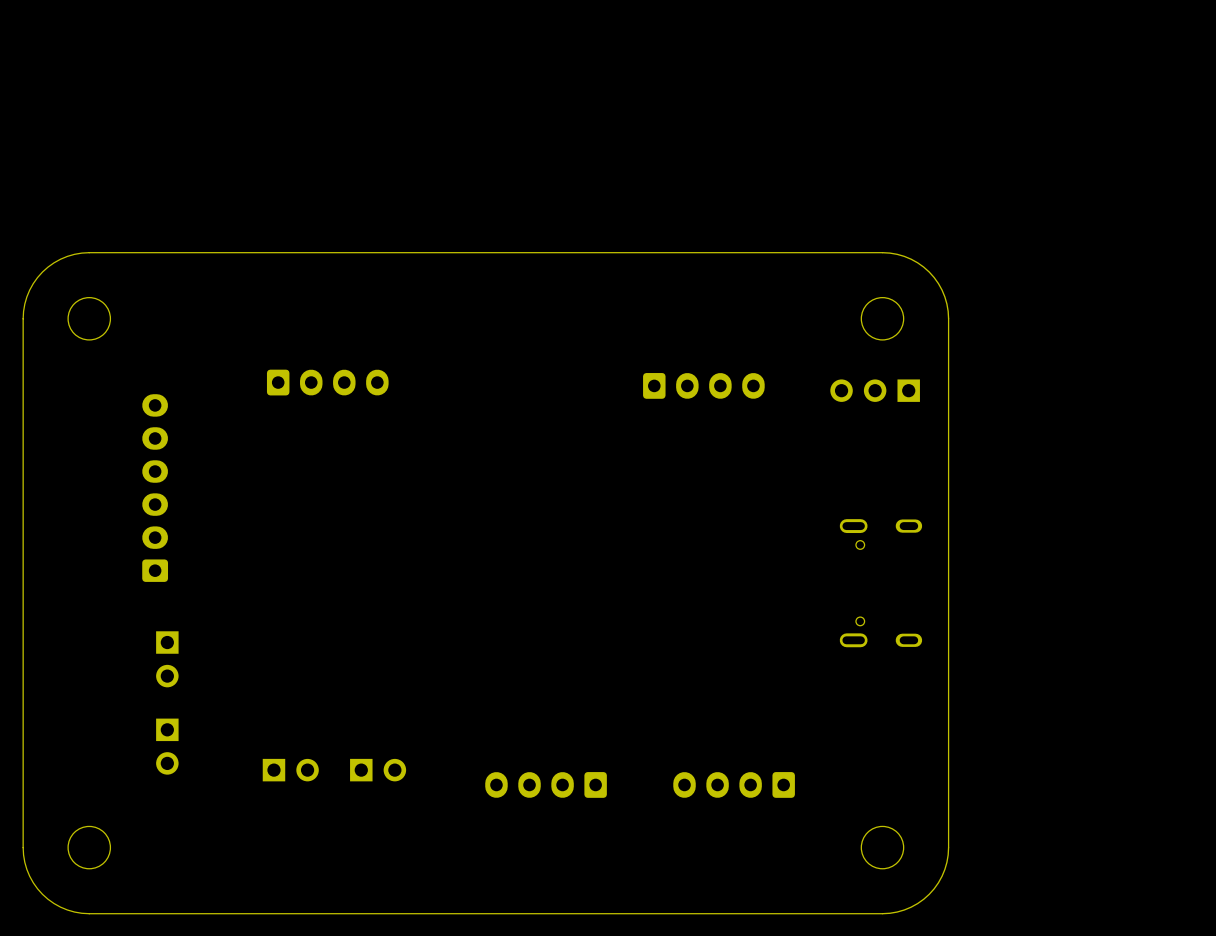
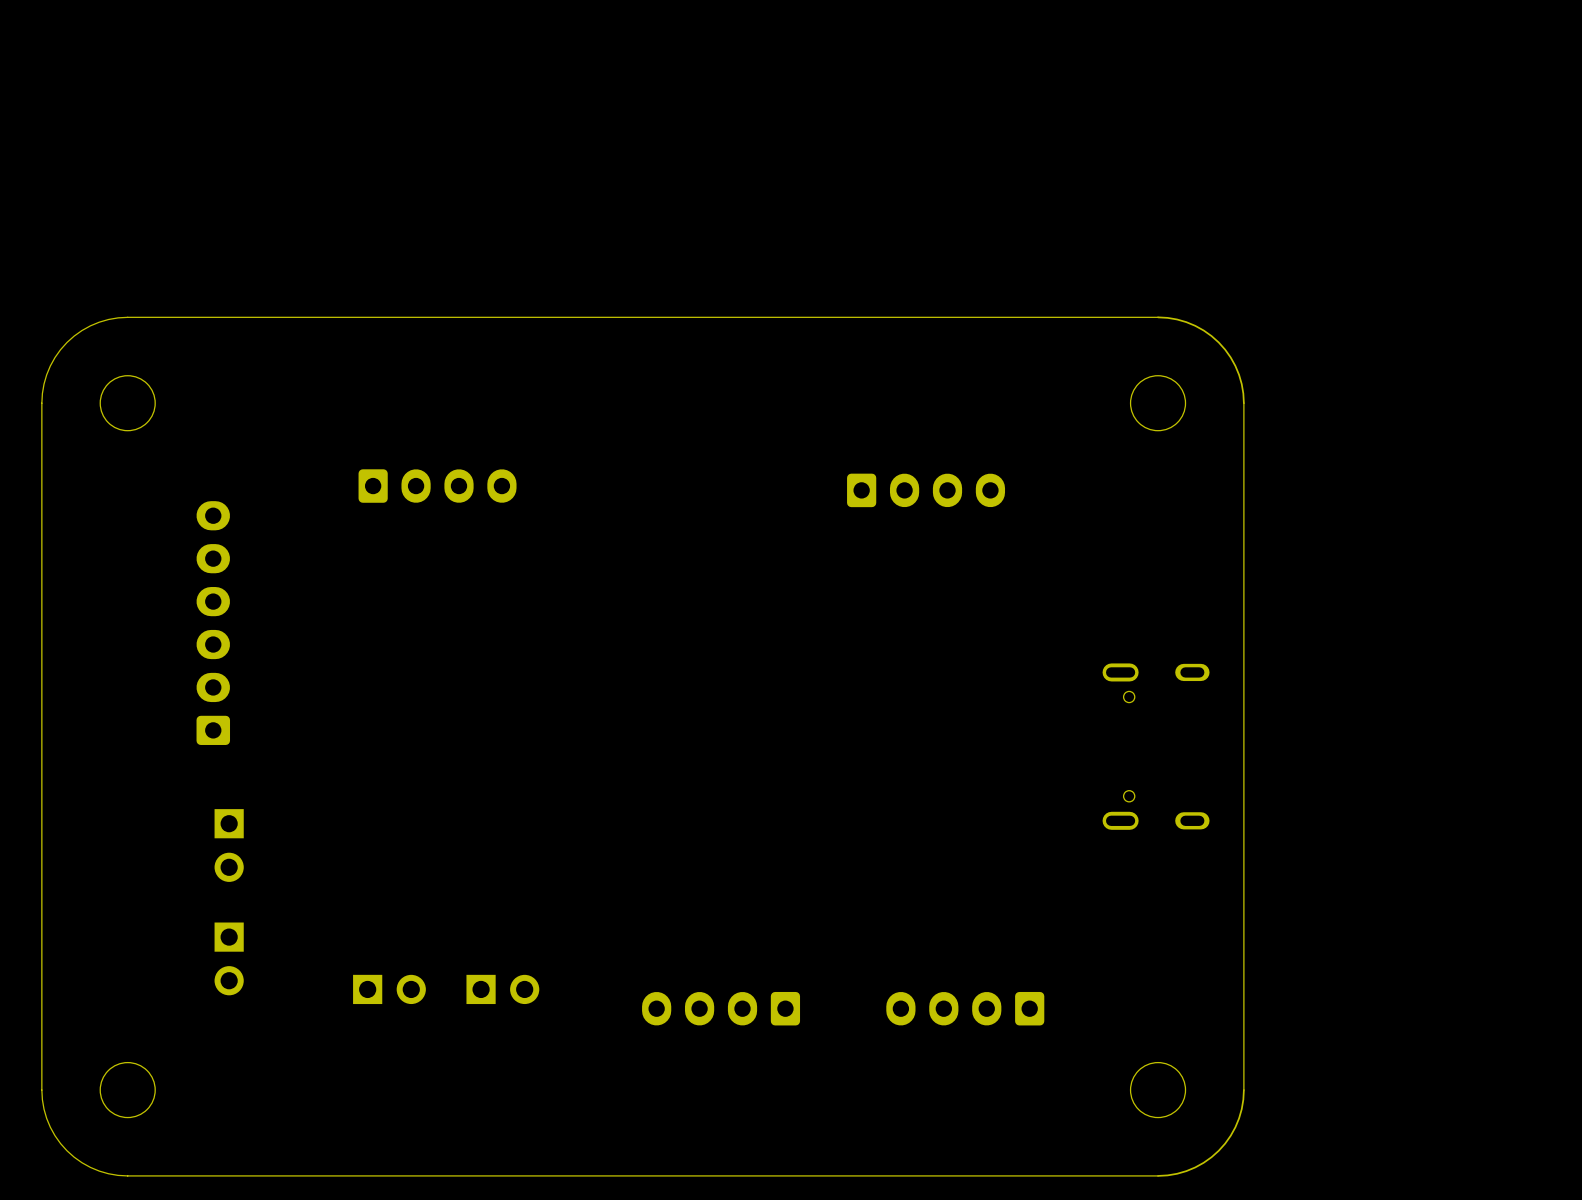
part: (875, 390) -> none

